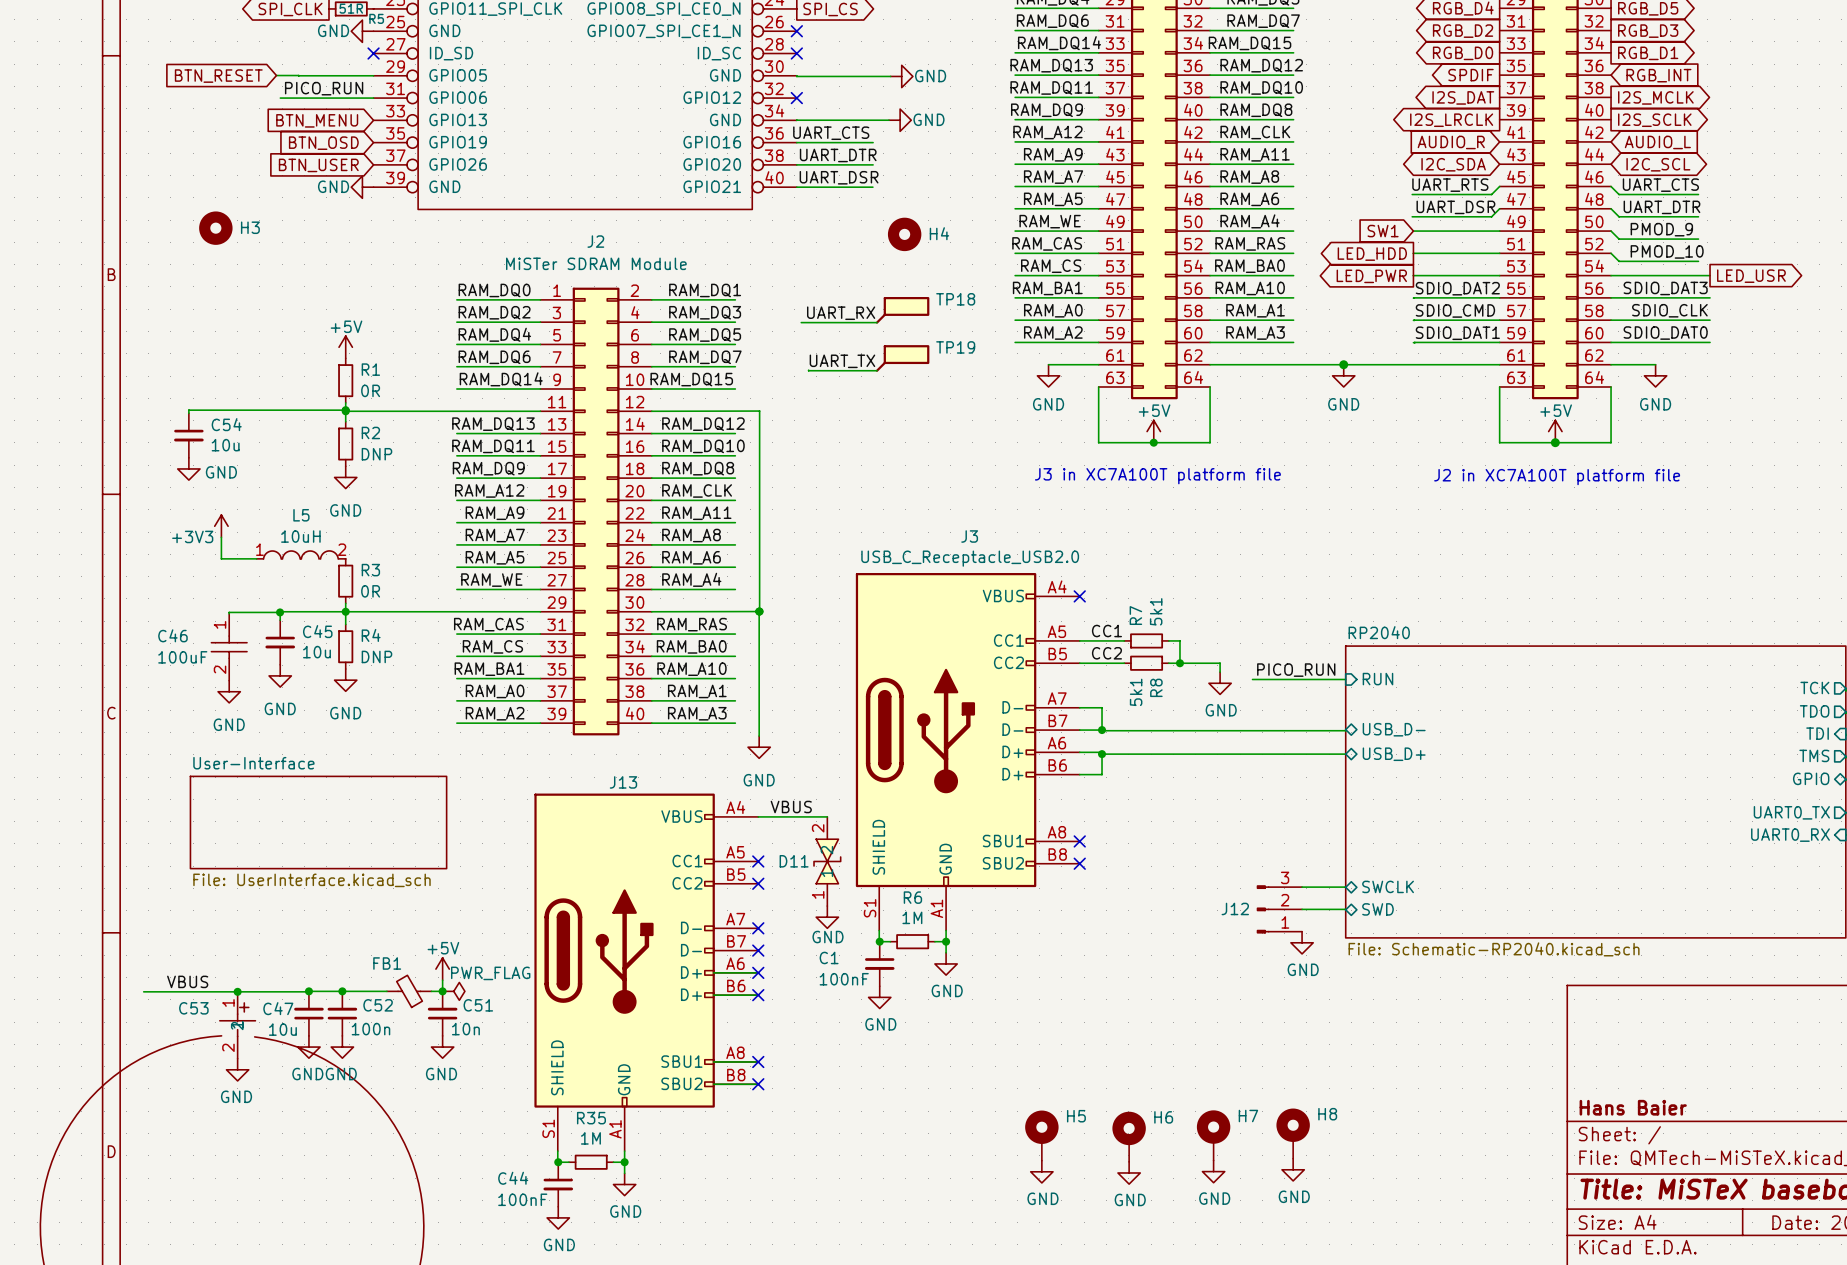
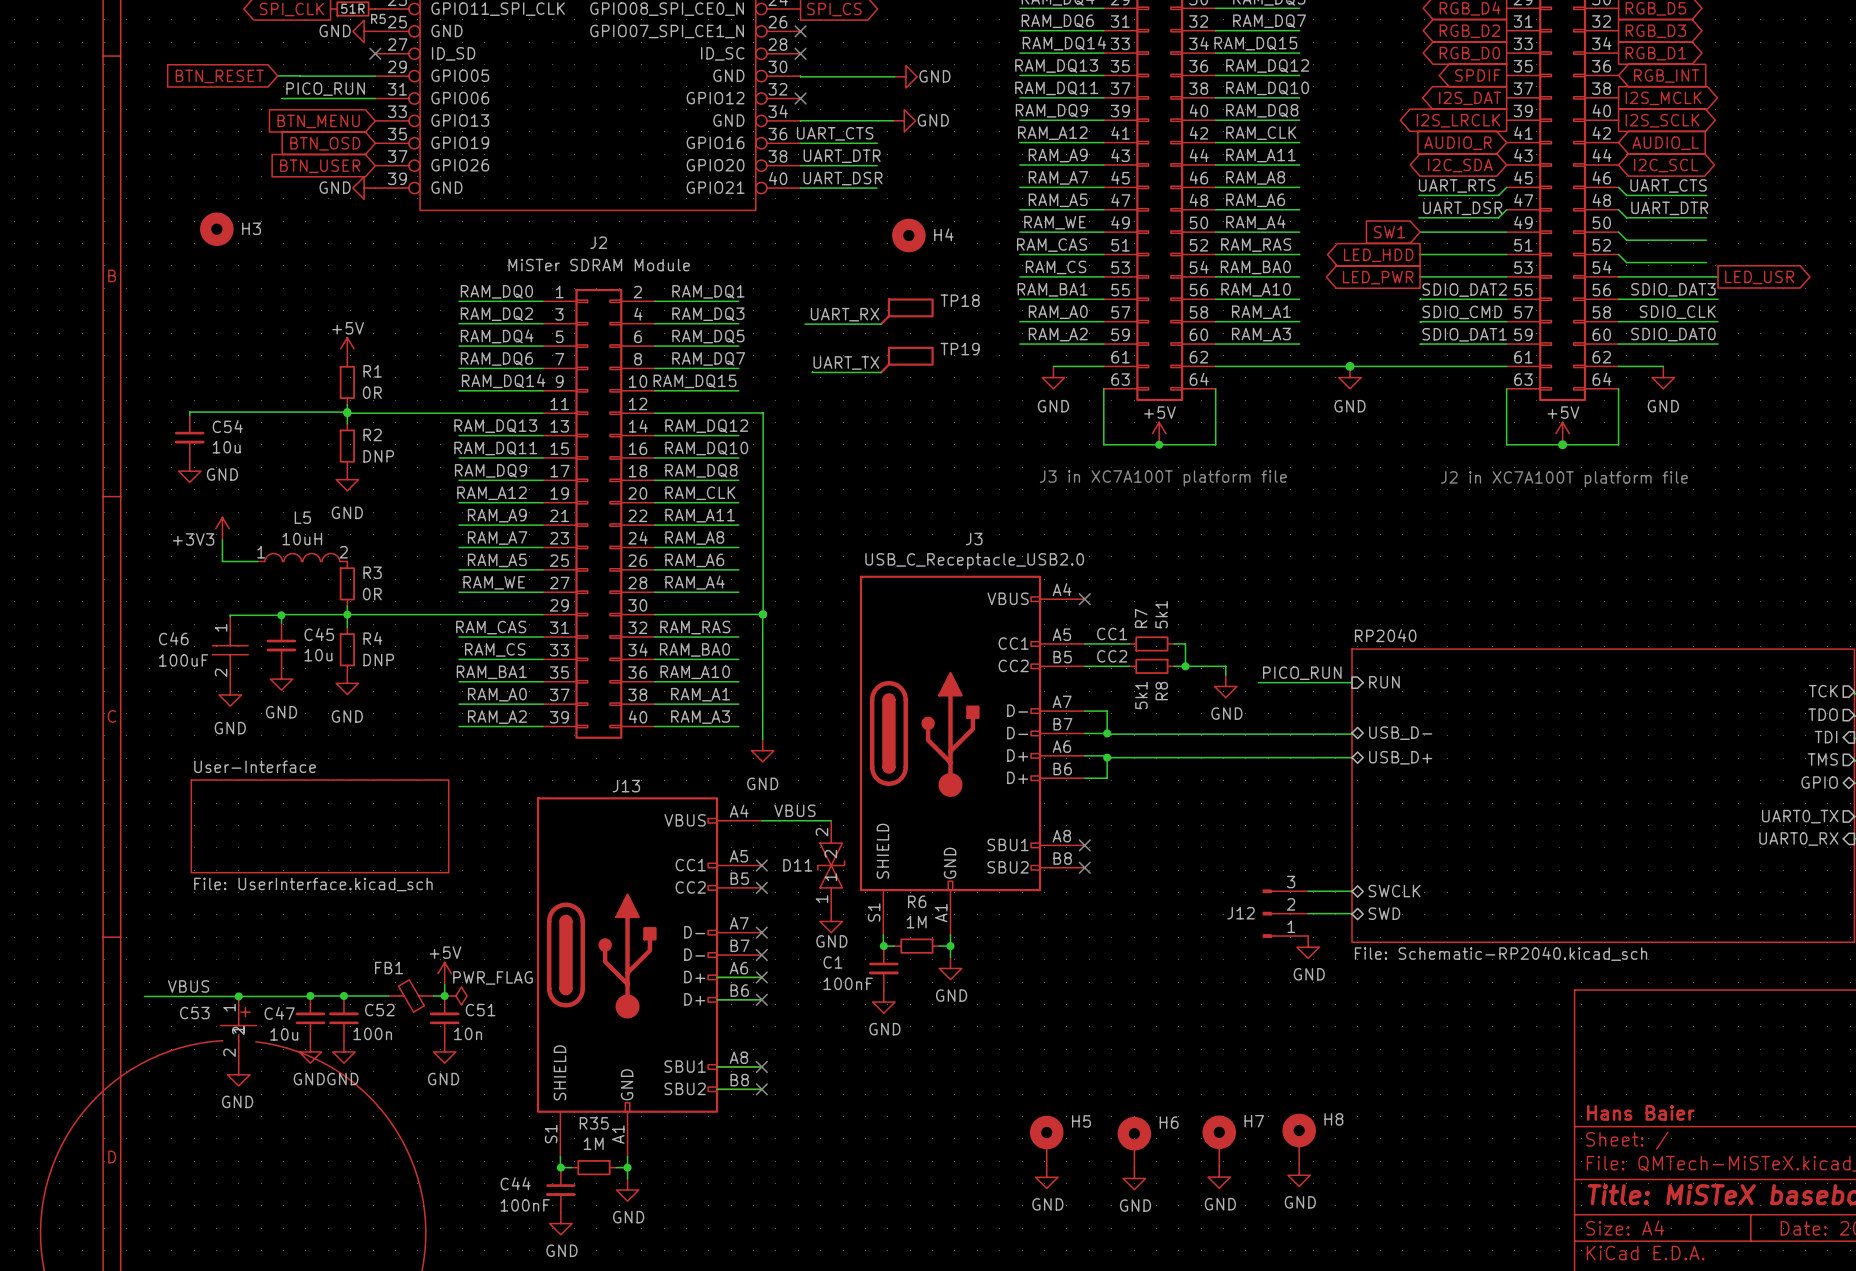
label: PMOD_9 (1661, 229) -> none
label: PMOD_10 (1667, 251) -> none

